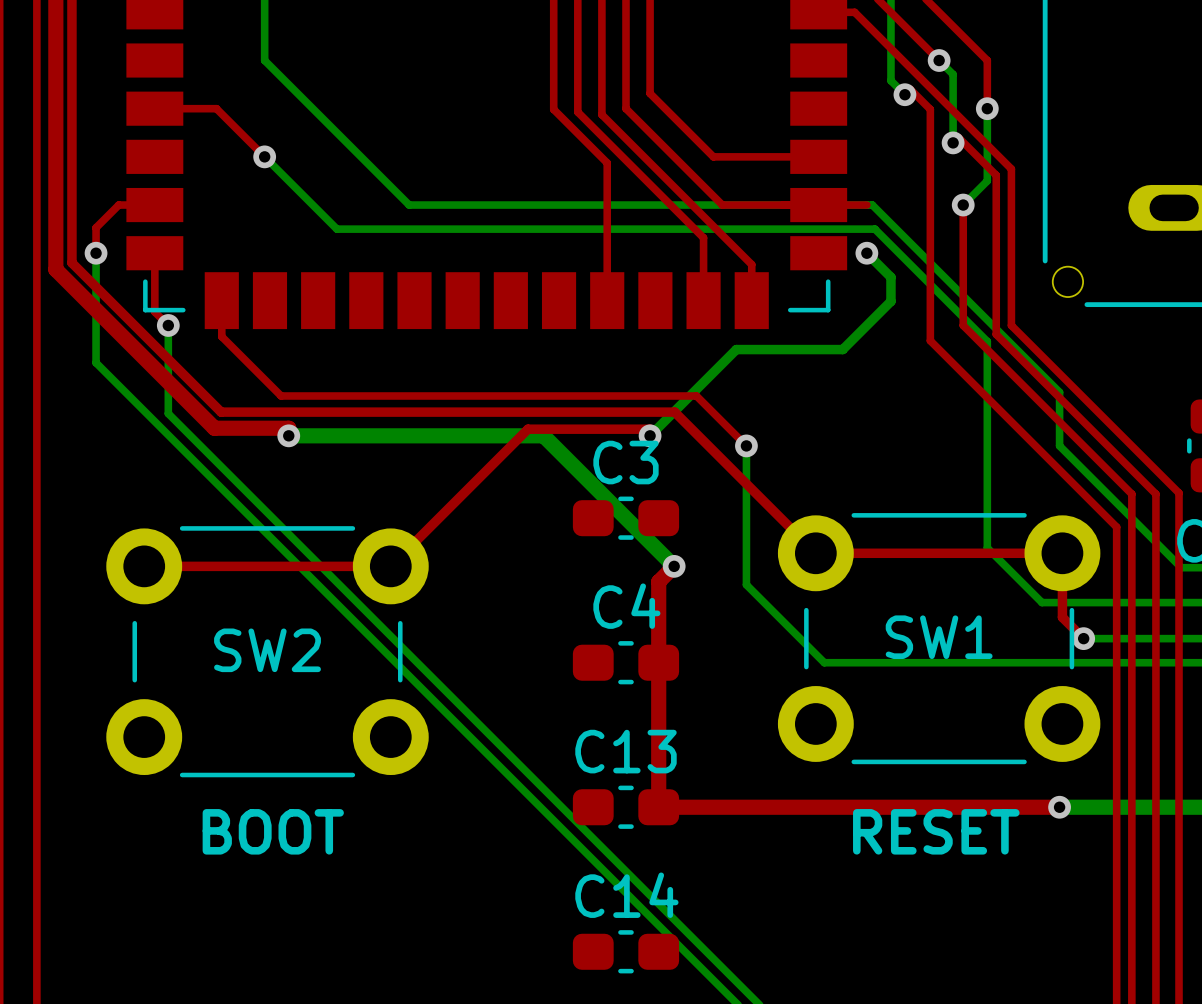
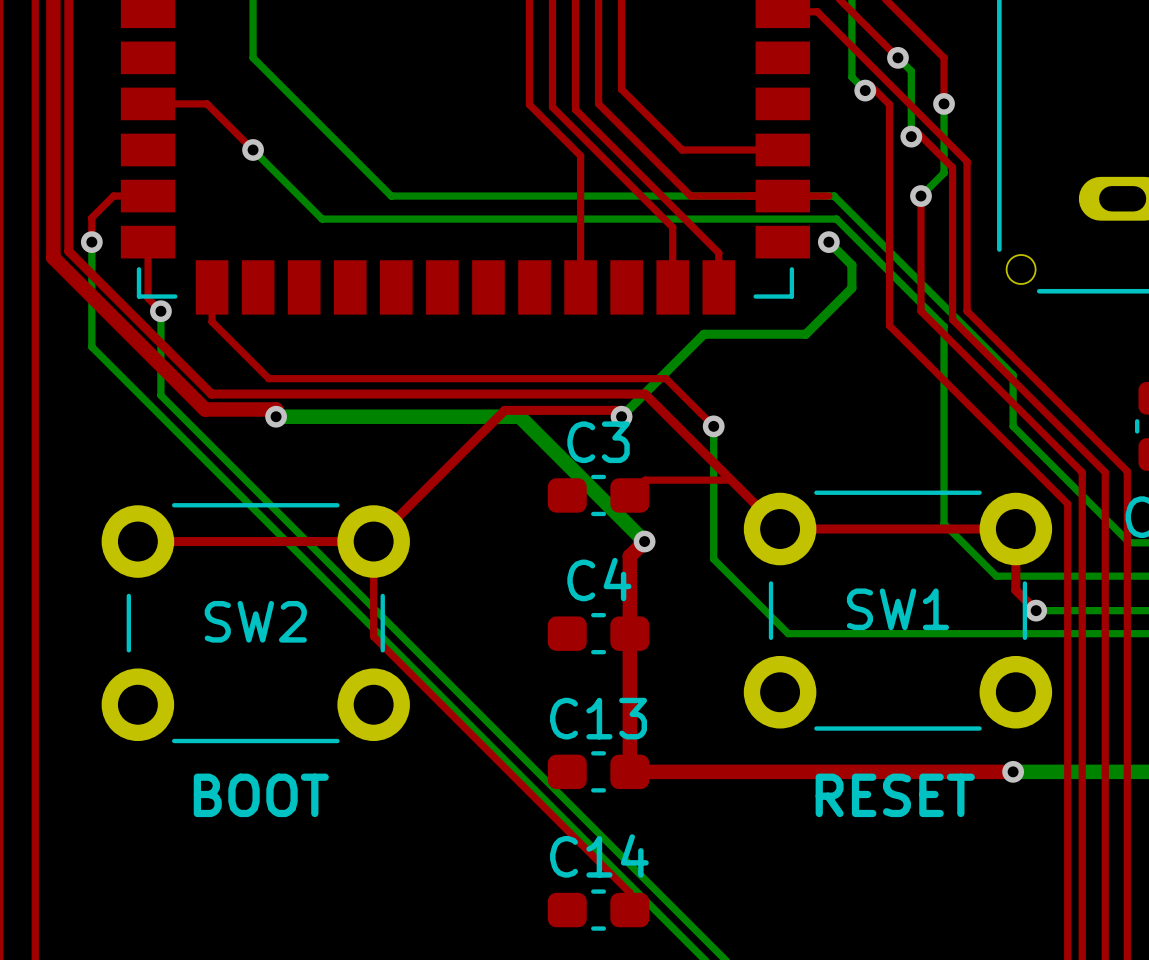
top track: none -> (629, 495) (645, 480) (731, 480) (780, 529)
top track: none -> (373, 541) (373, 636) (629, 892) (629, 910)

